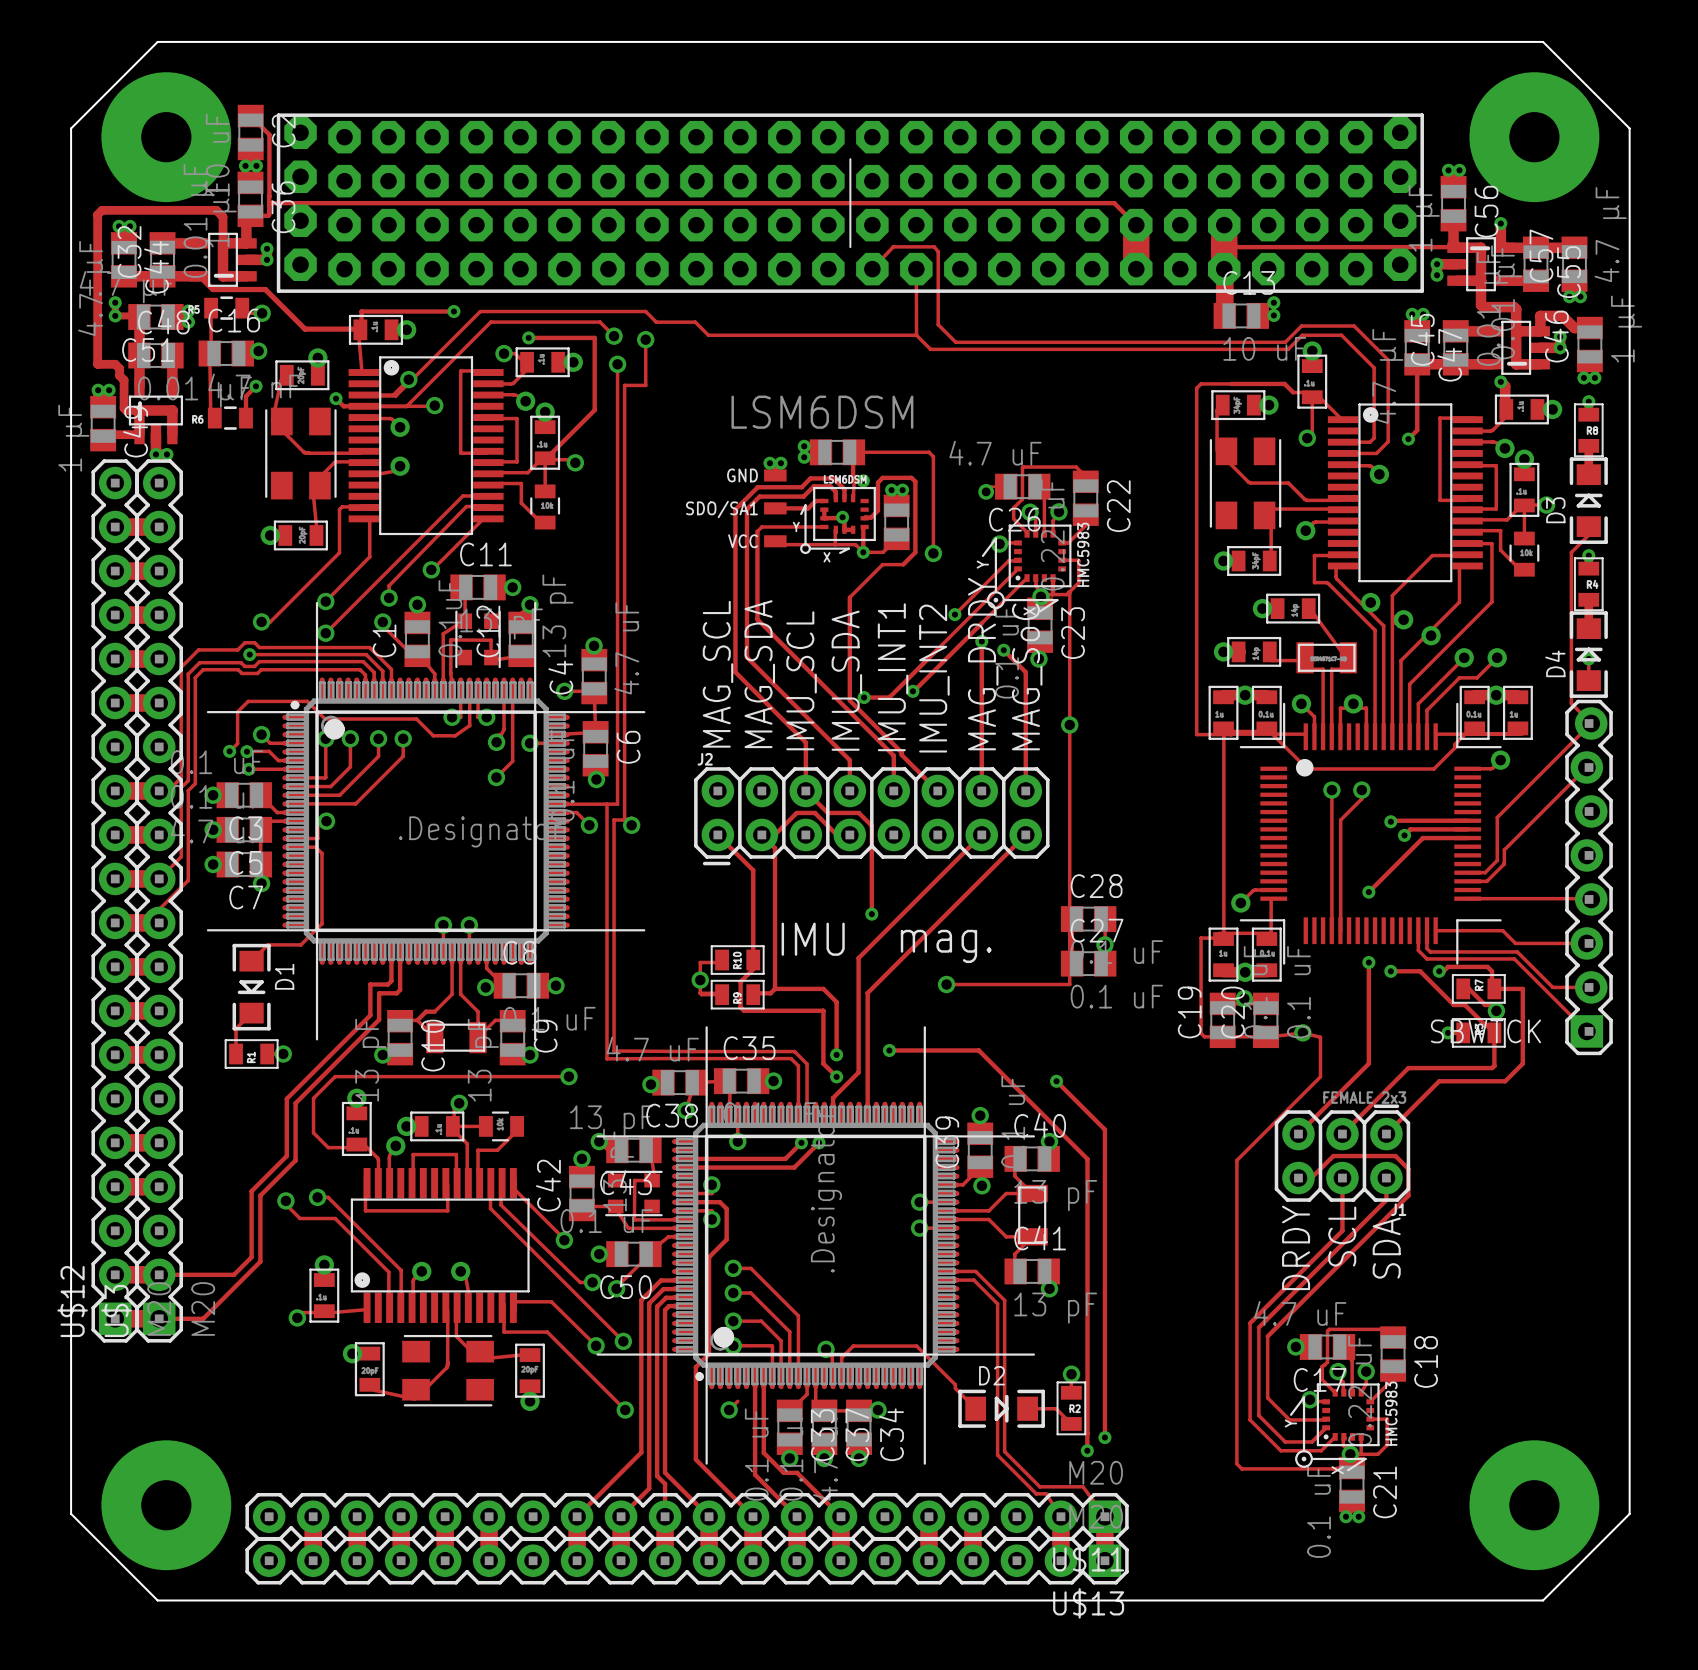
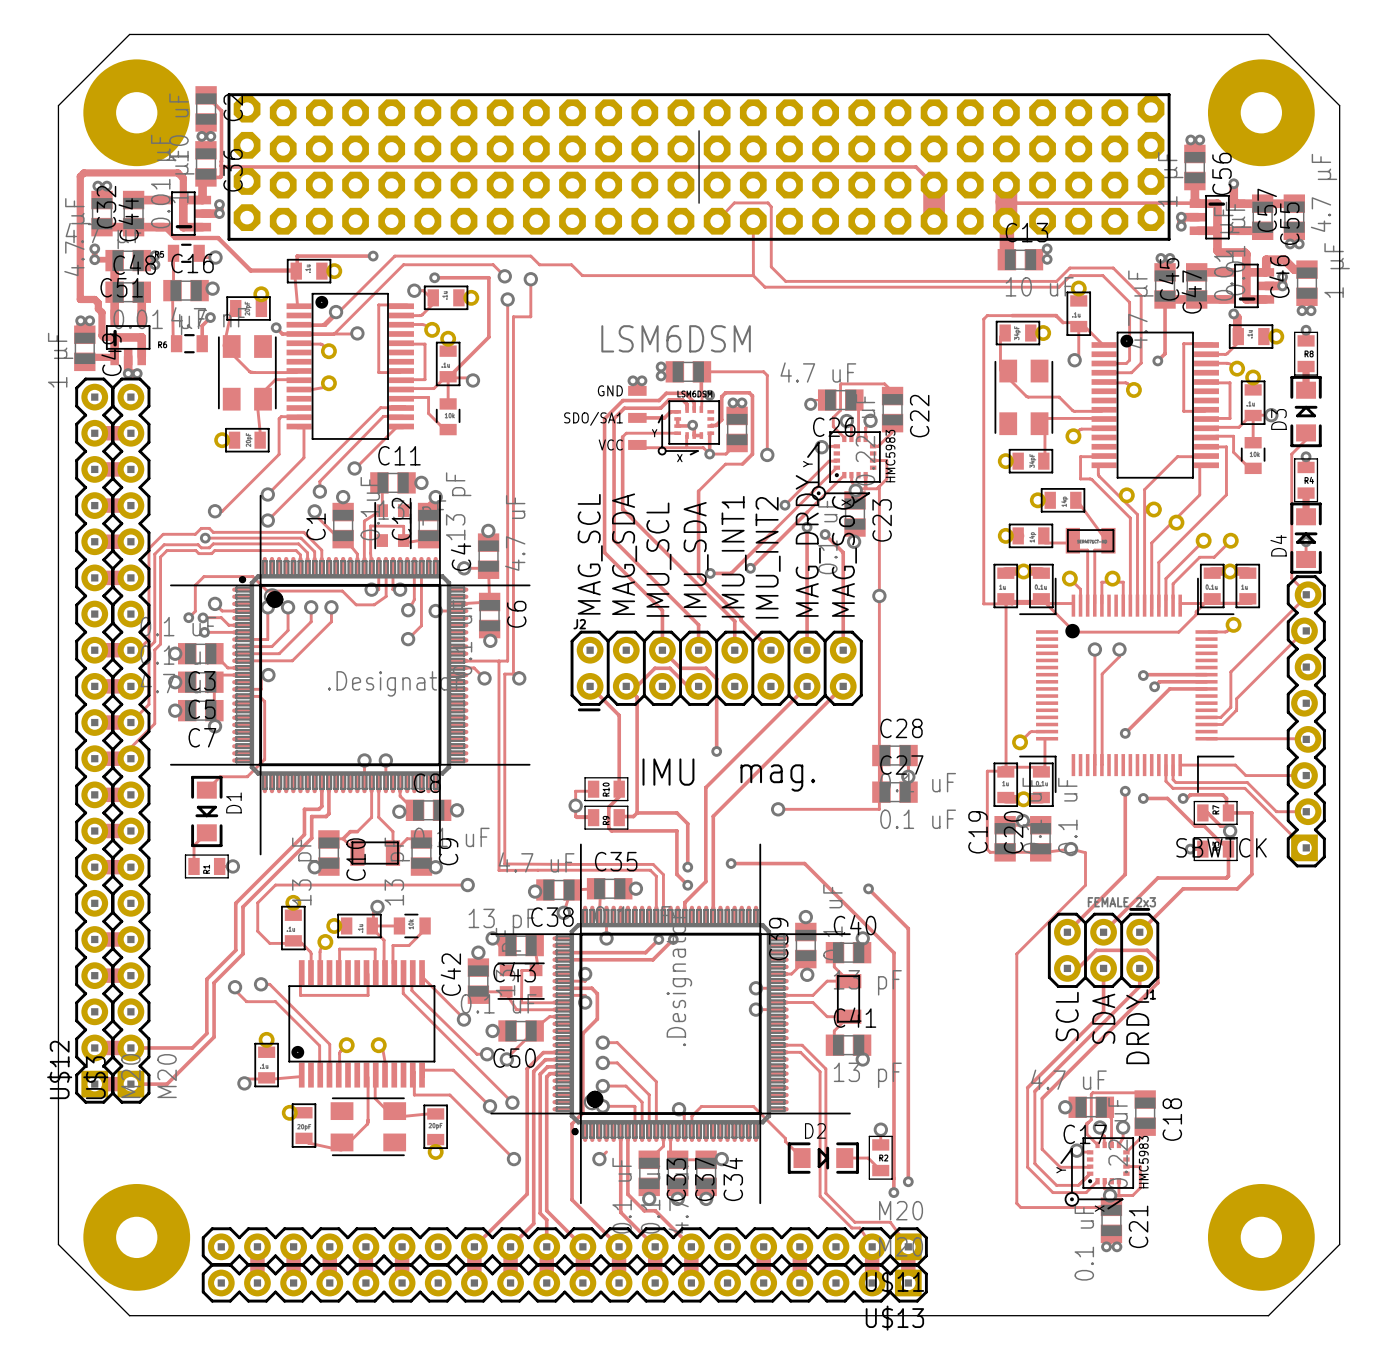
text position: SCL (1342, 1236) -> SCL (1067, 1016)
text position: DRDY (1296, 1247) -> DRDY (1137, 1029)
text position: SDA (1386, 1248) -> SDA (1103, 1018)

